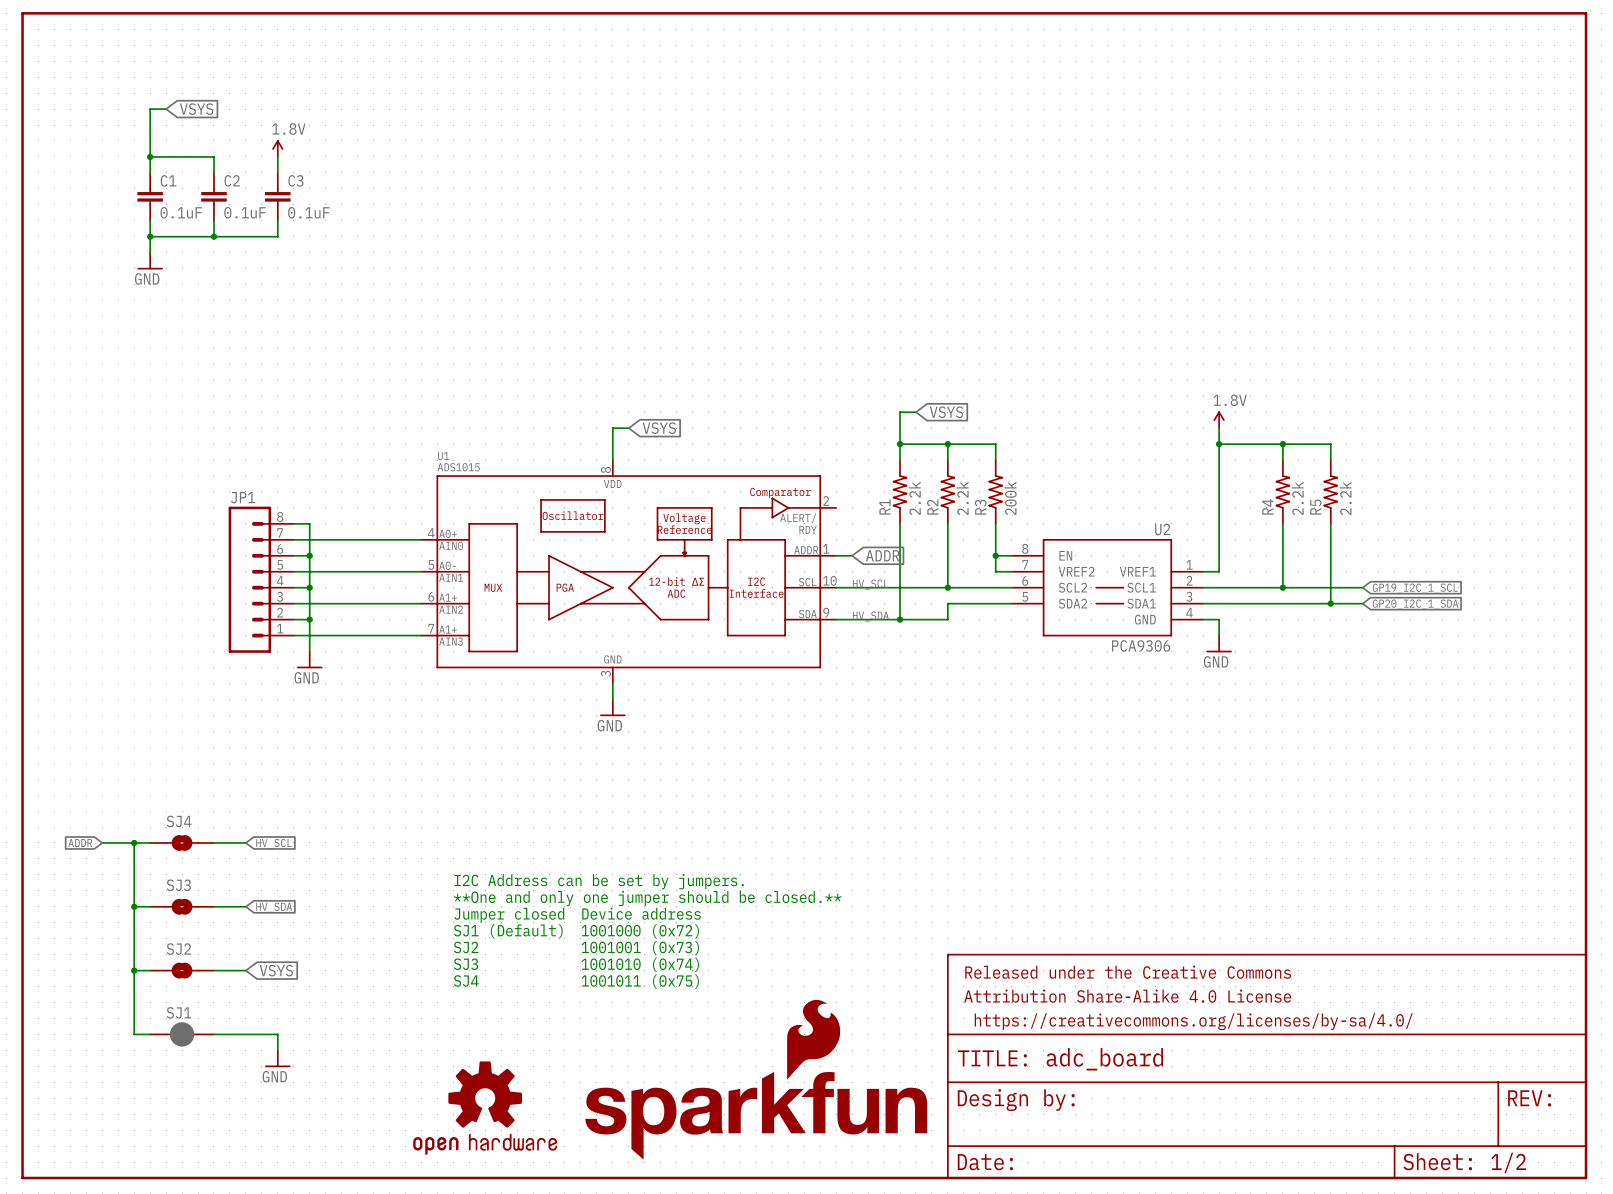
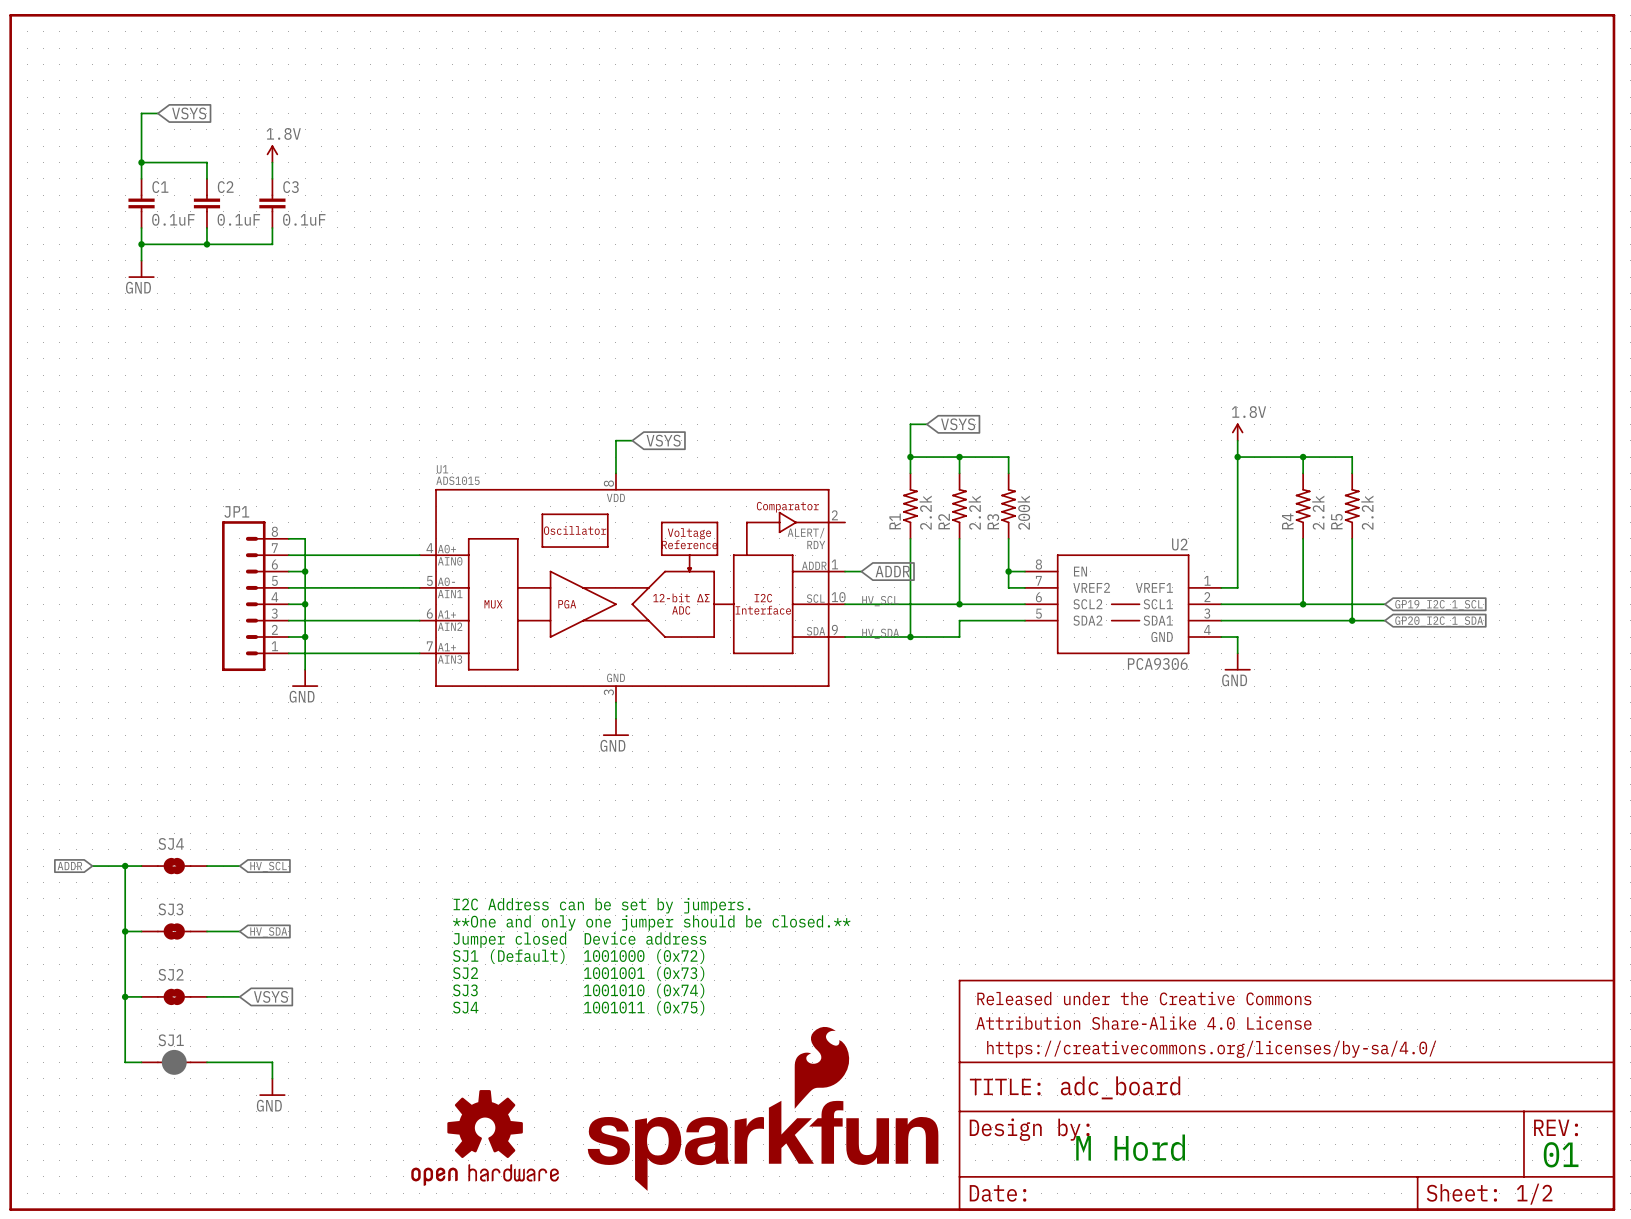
text: none -> M Hord (1130, 1147)
text: none -> 01 (1561, 1154)

